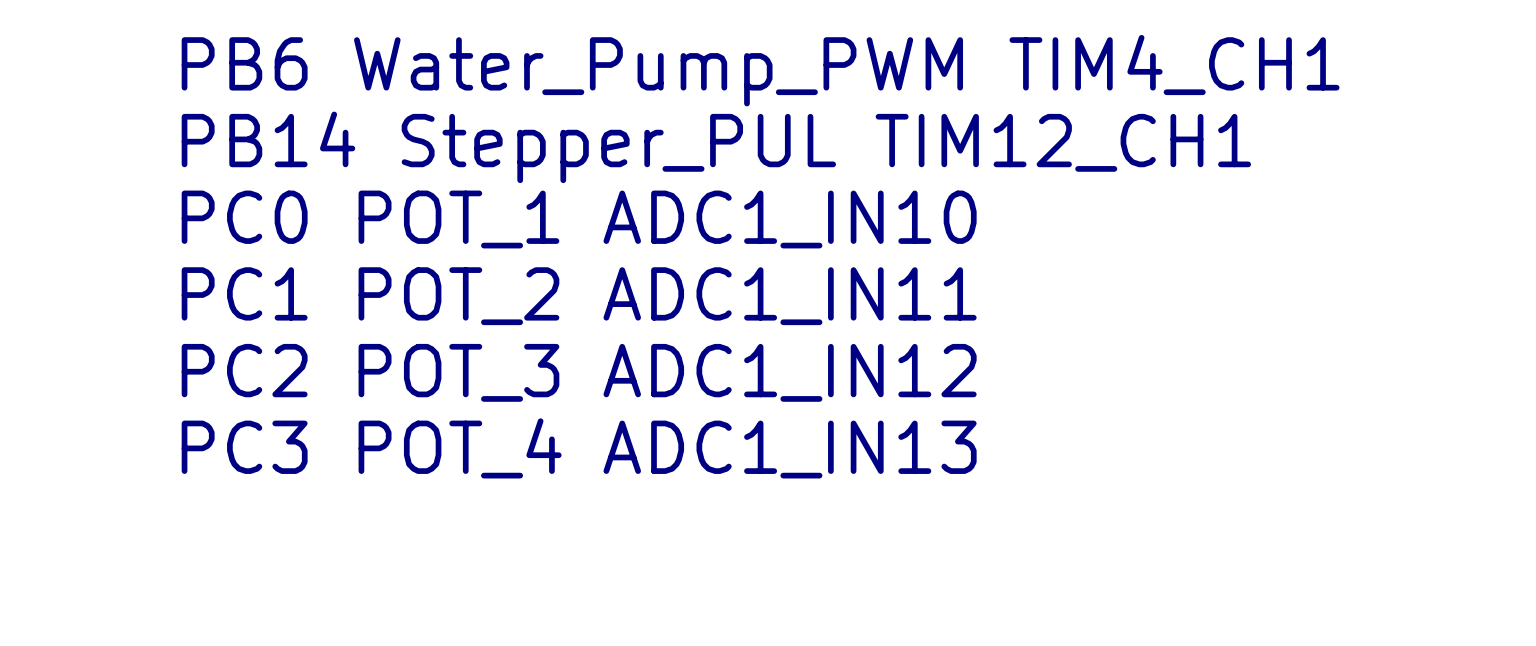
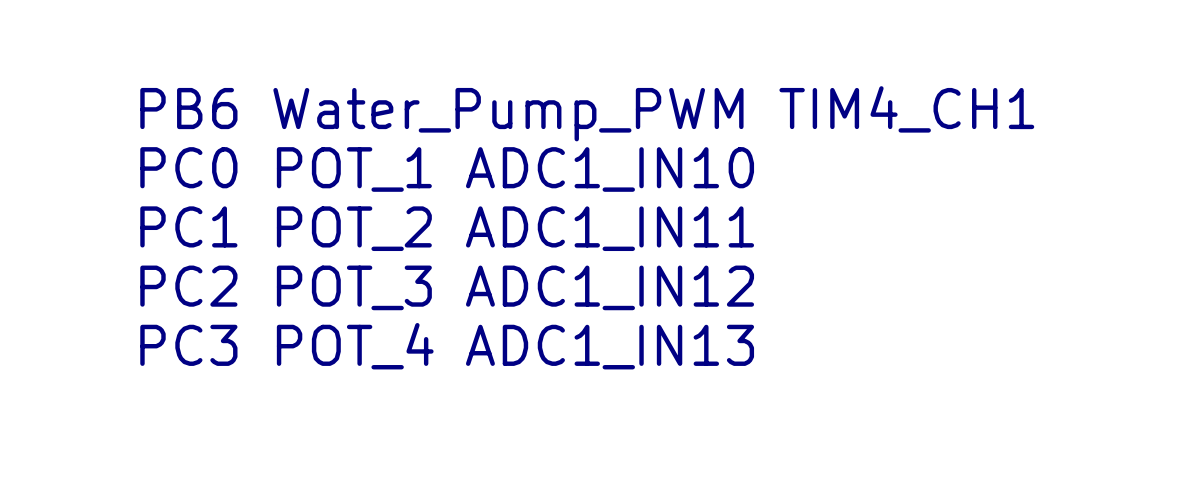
text: PB6 Water_Pump_PWM TIM4_CH1 (760, 70) -> none
text: PB14 Stepper_PUL TIM12_CH1 (716, 147) -> PB6 Water_Pump_PWM TIM4_CH1 (587, 113)

